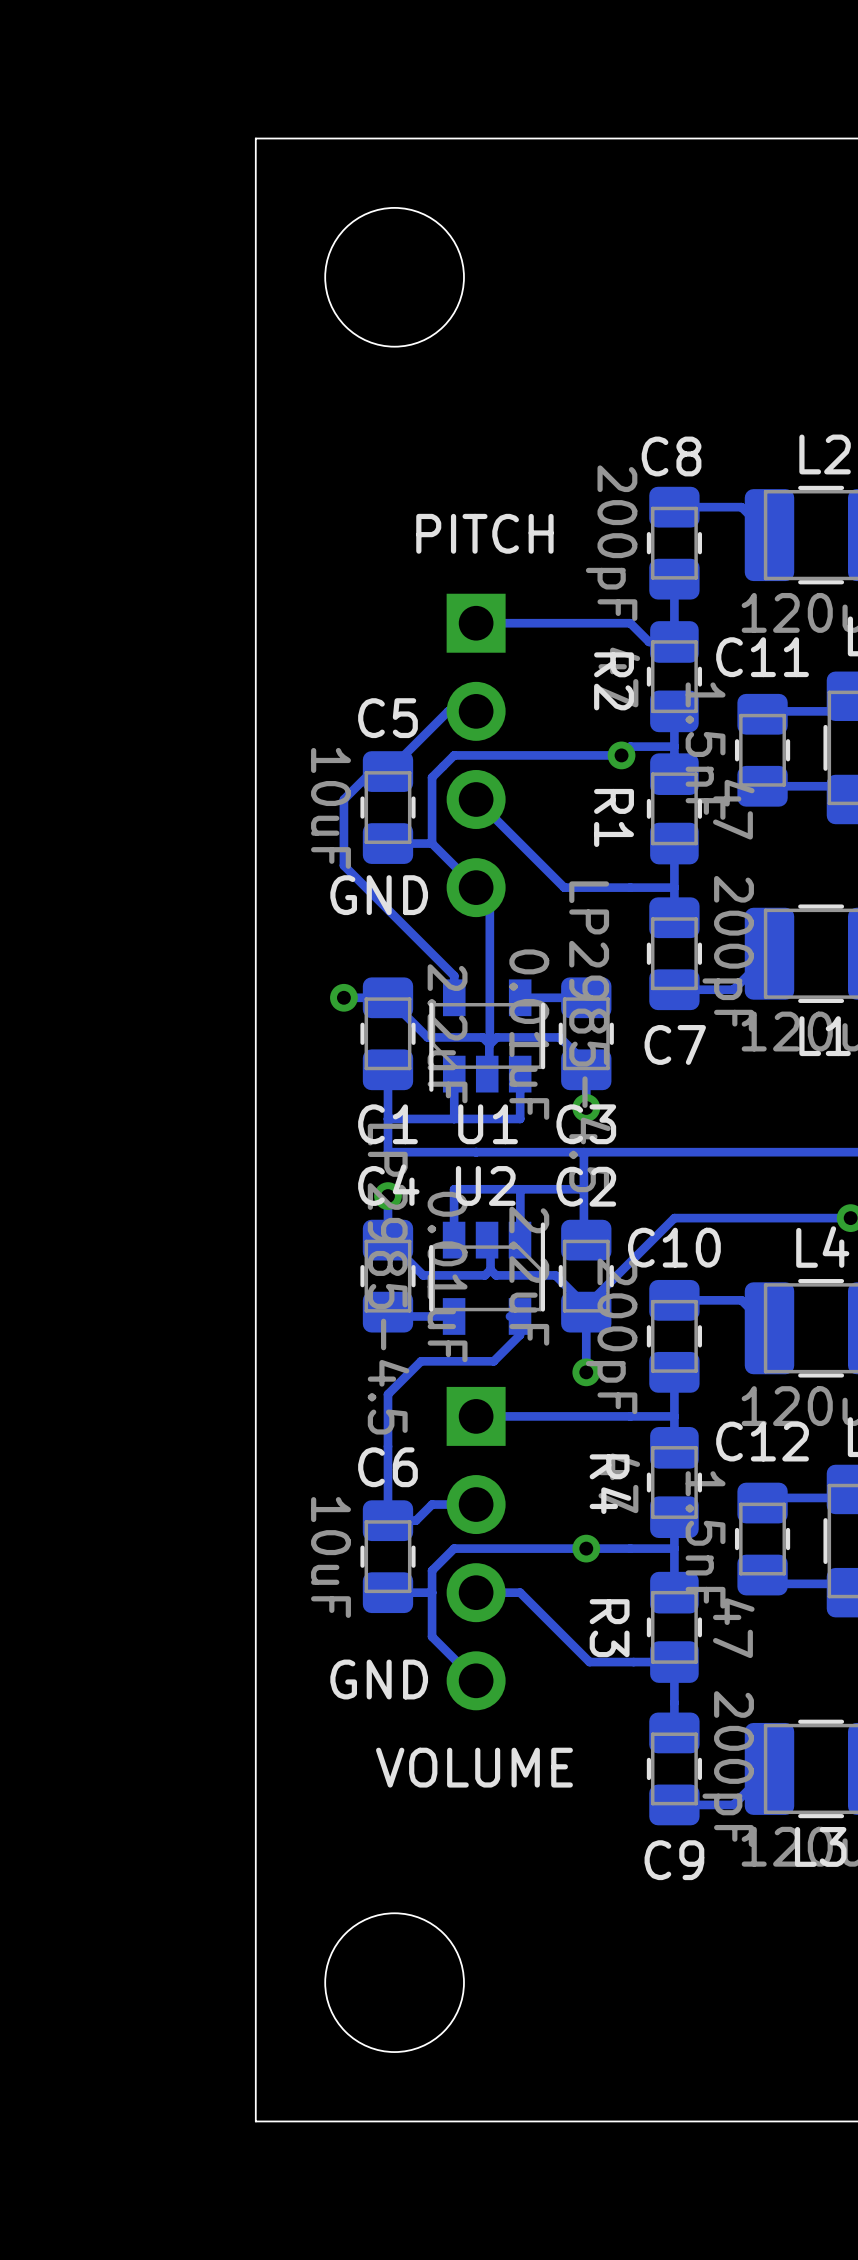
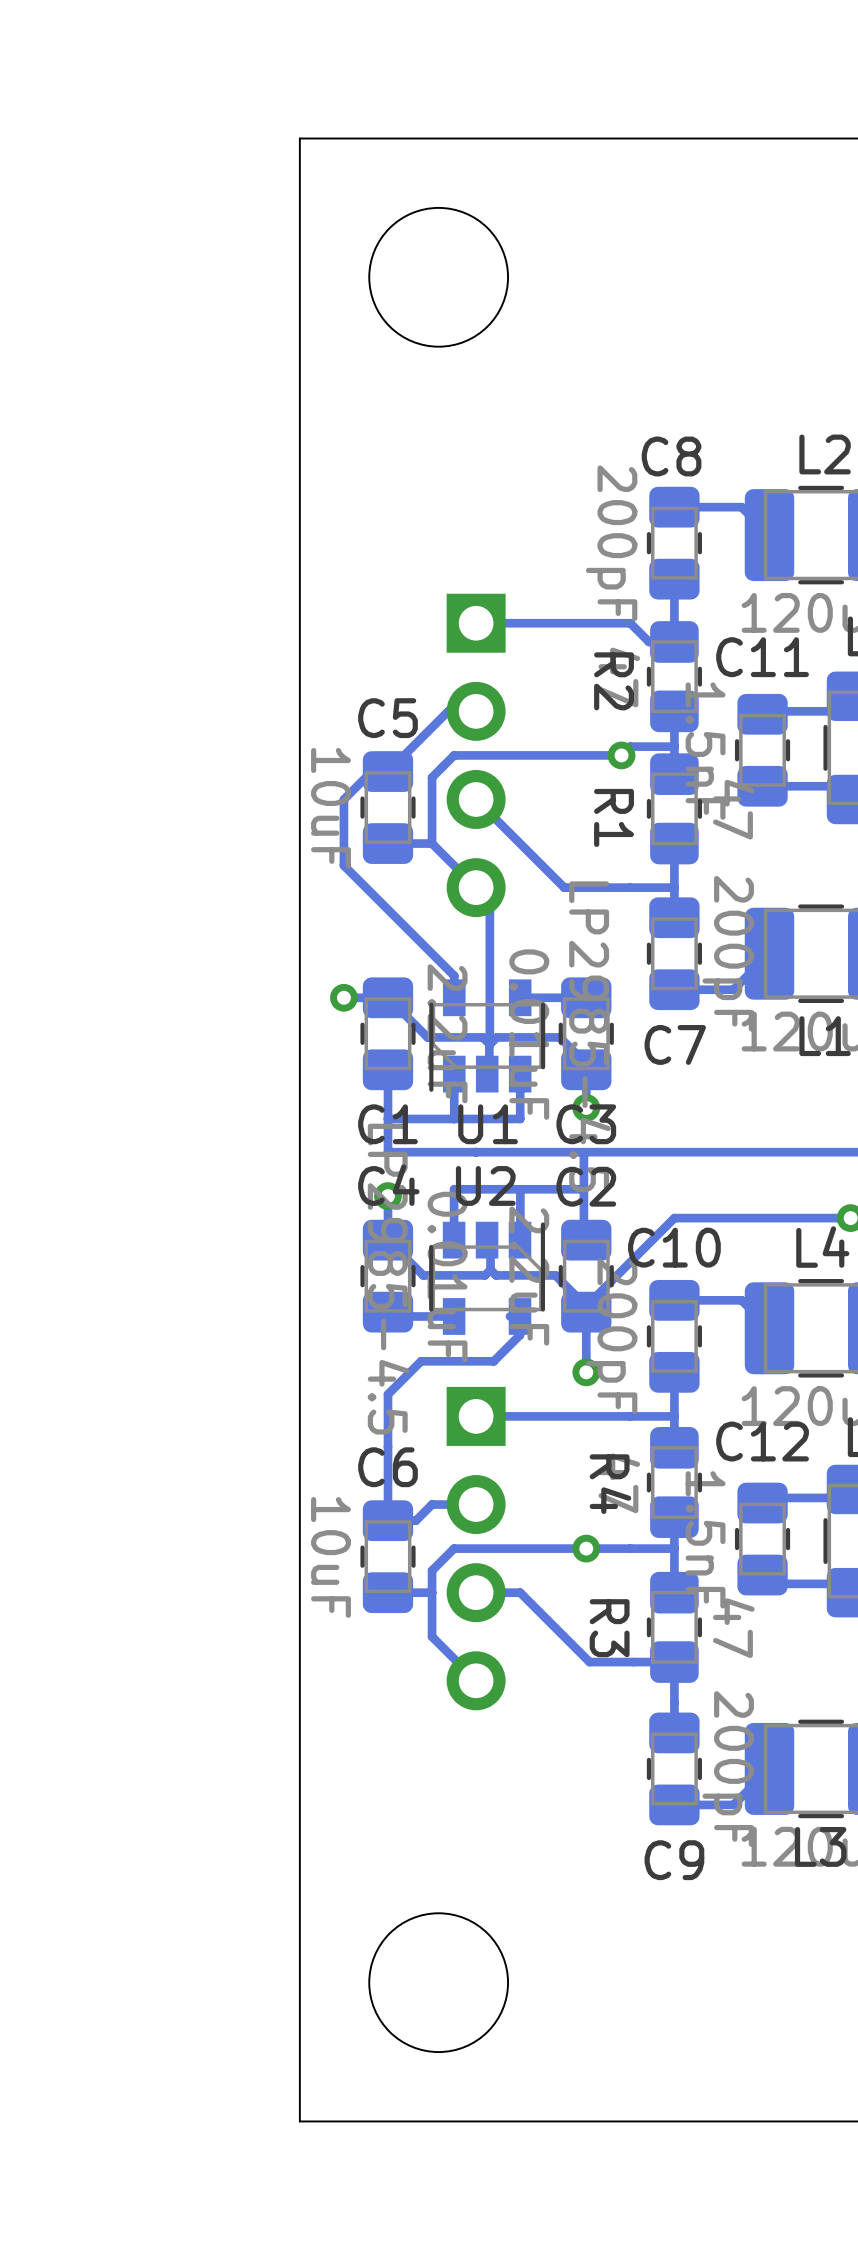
board edge: (299, 138) (255, 138) (255, 2121) (299, 2121) -> (299, 138) (299, 2121)
round board edge position: (394, 277) -> (438, 277)
text: PITCH (484, 533) -> none
text: GND (379, 895) -> none
text: GND (379, 1679) -> none
text: VOLUME (474, 1767) -> none
round board edge position: (394, 1982) -> (438, 1982)

